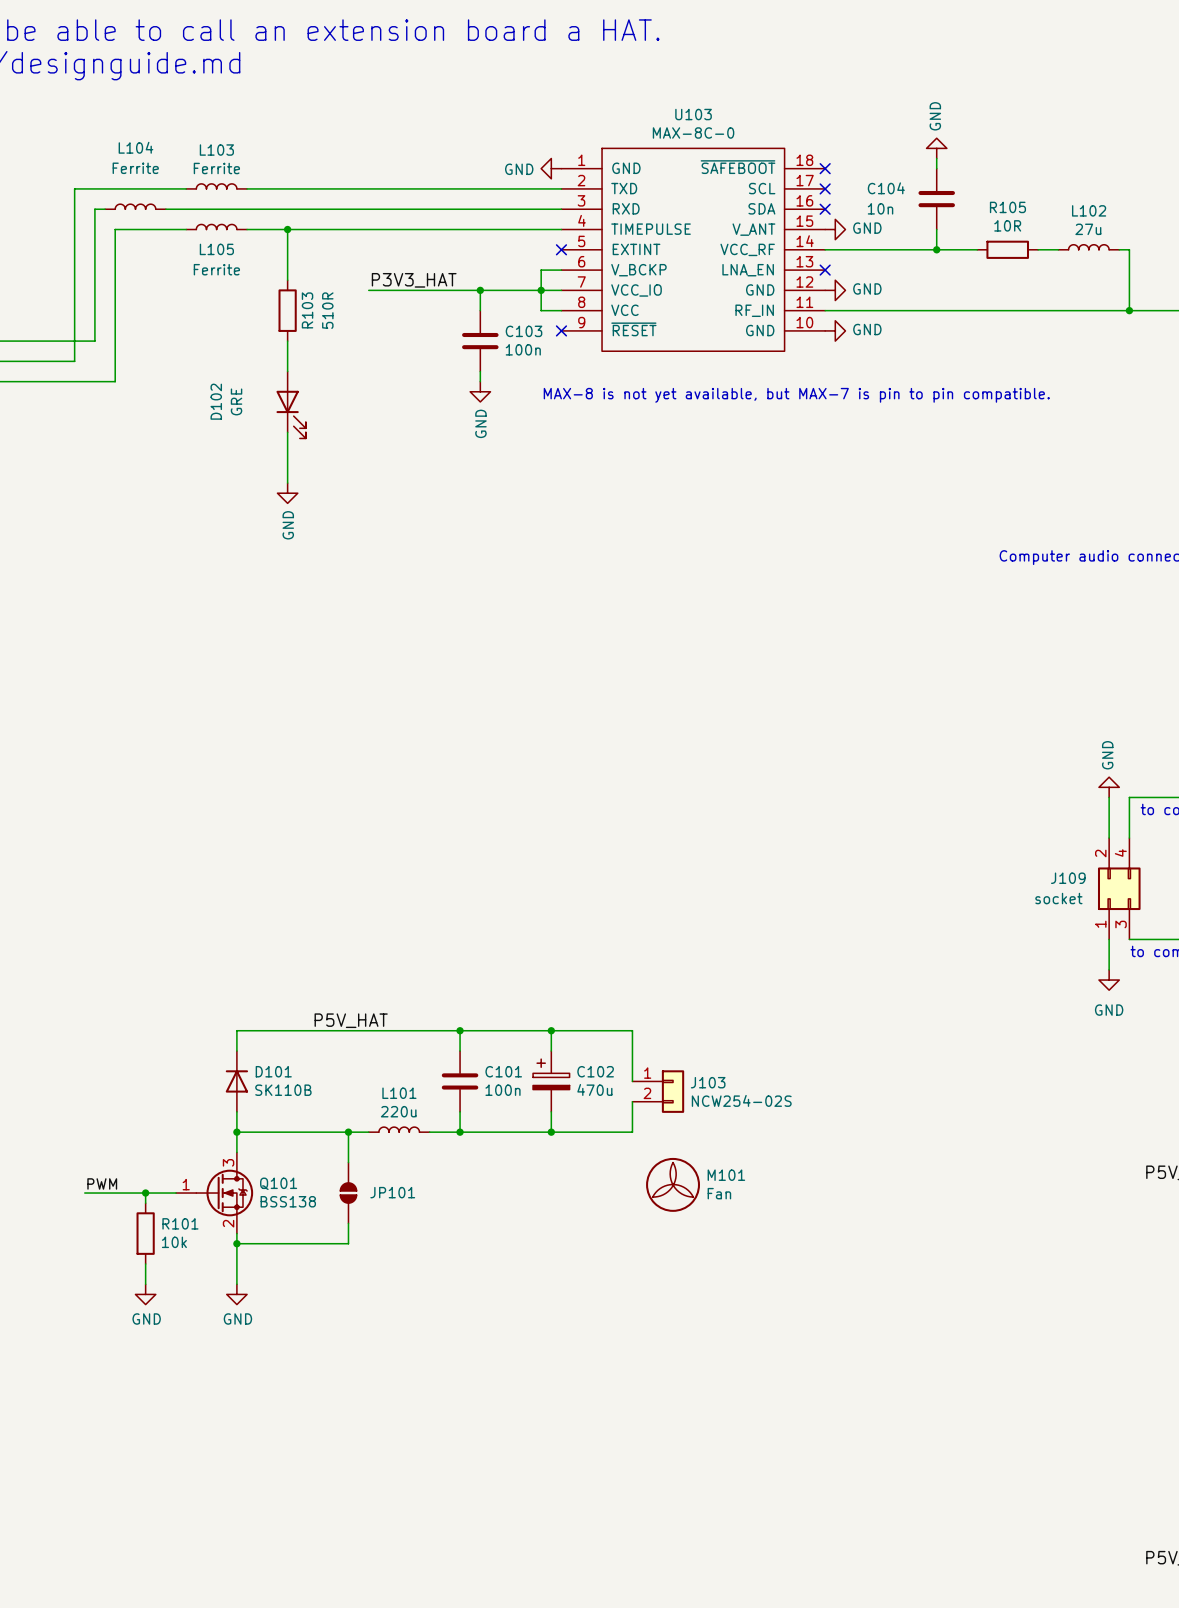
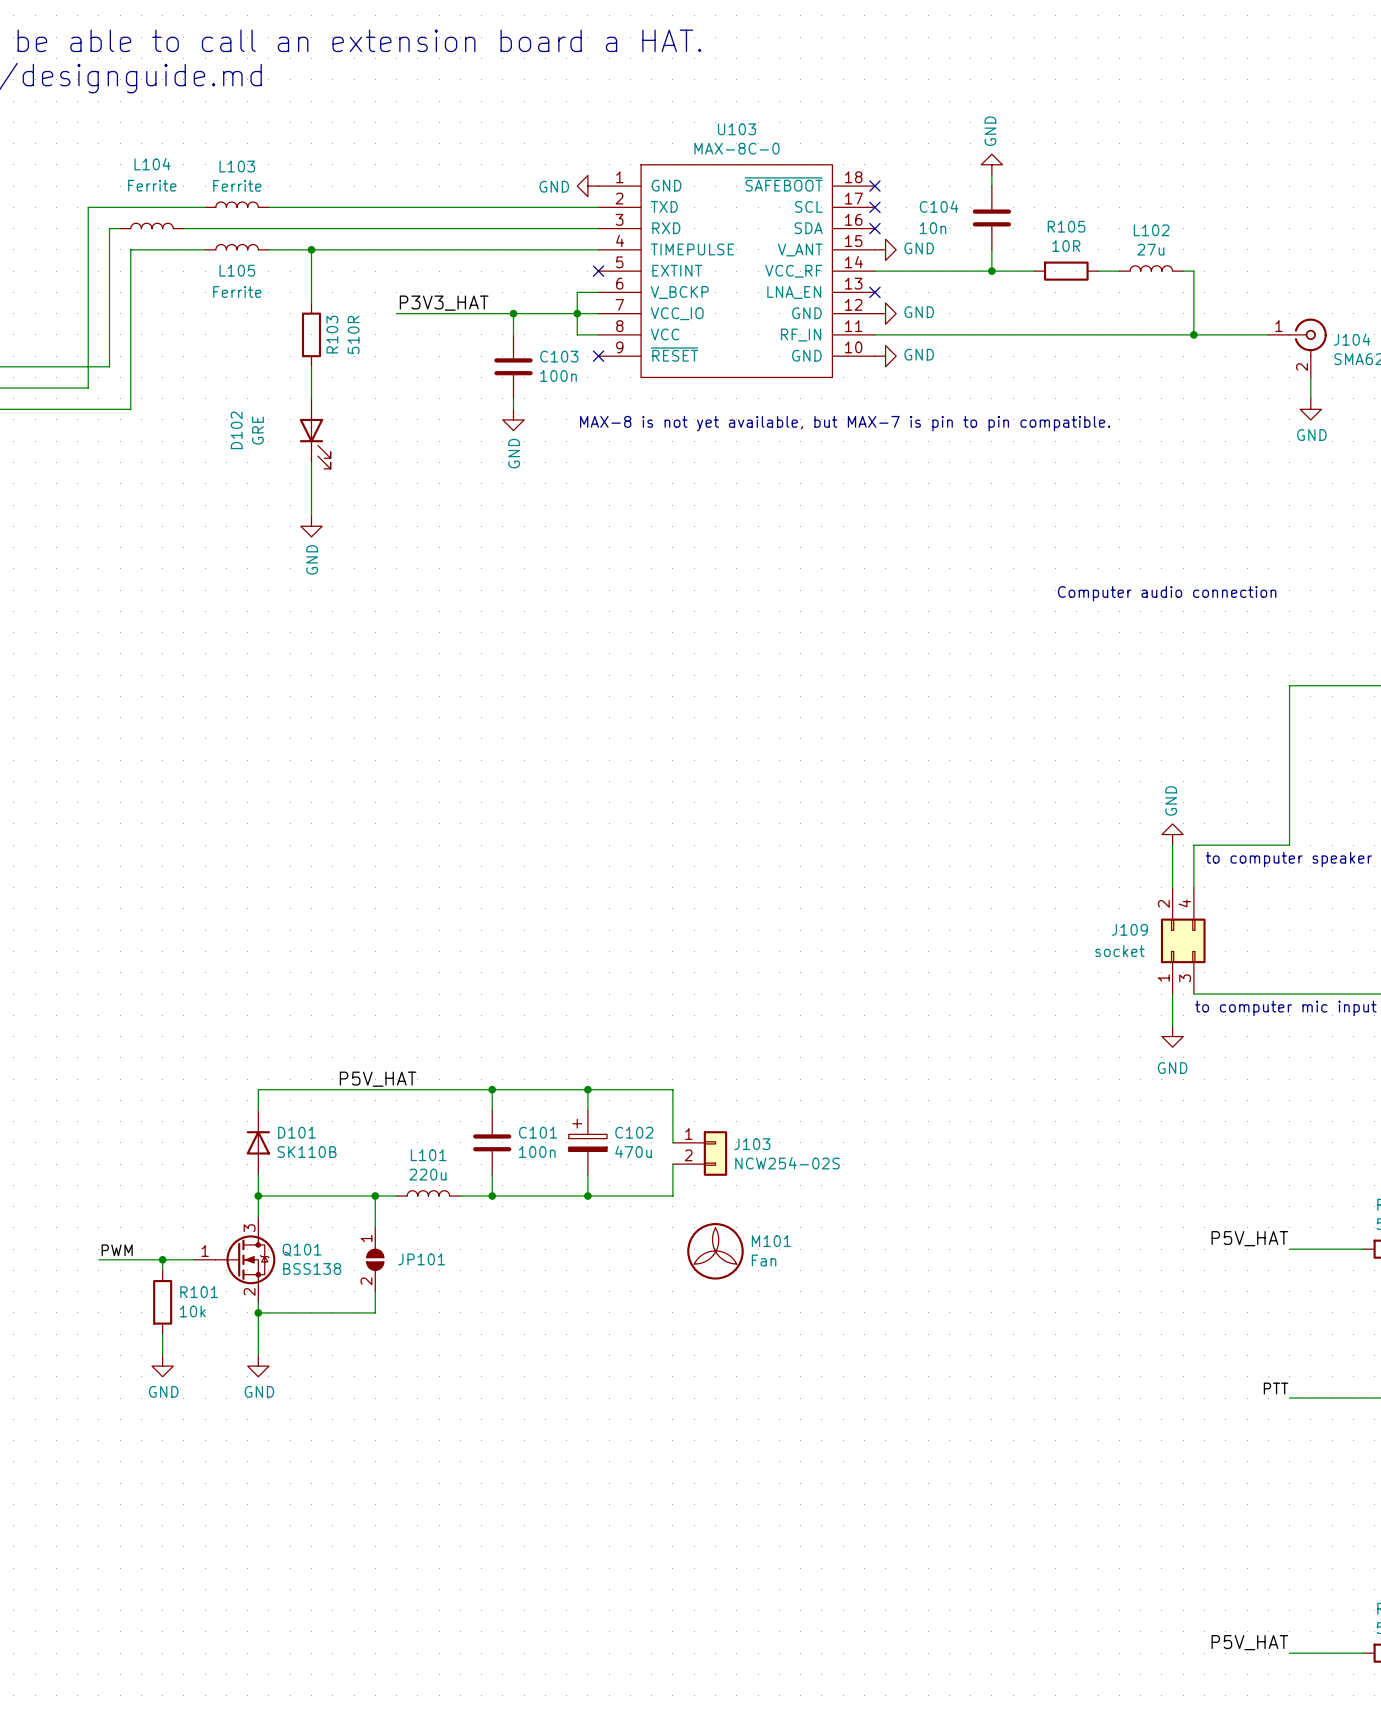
JP101 pin number: none -> 1 (366, 1238)
JP101 pin number: none -> 2 (366, 1281)

